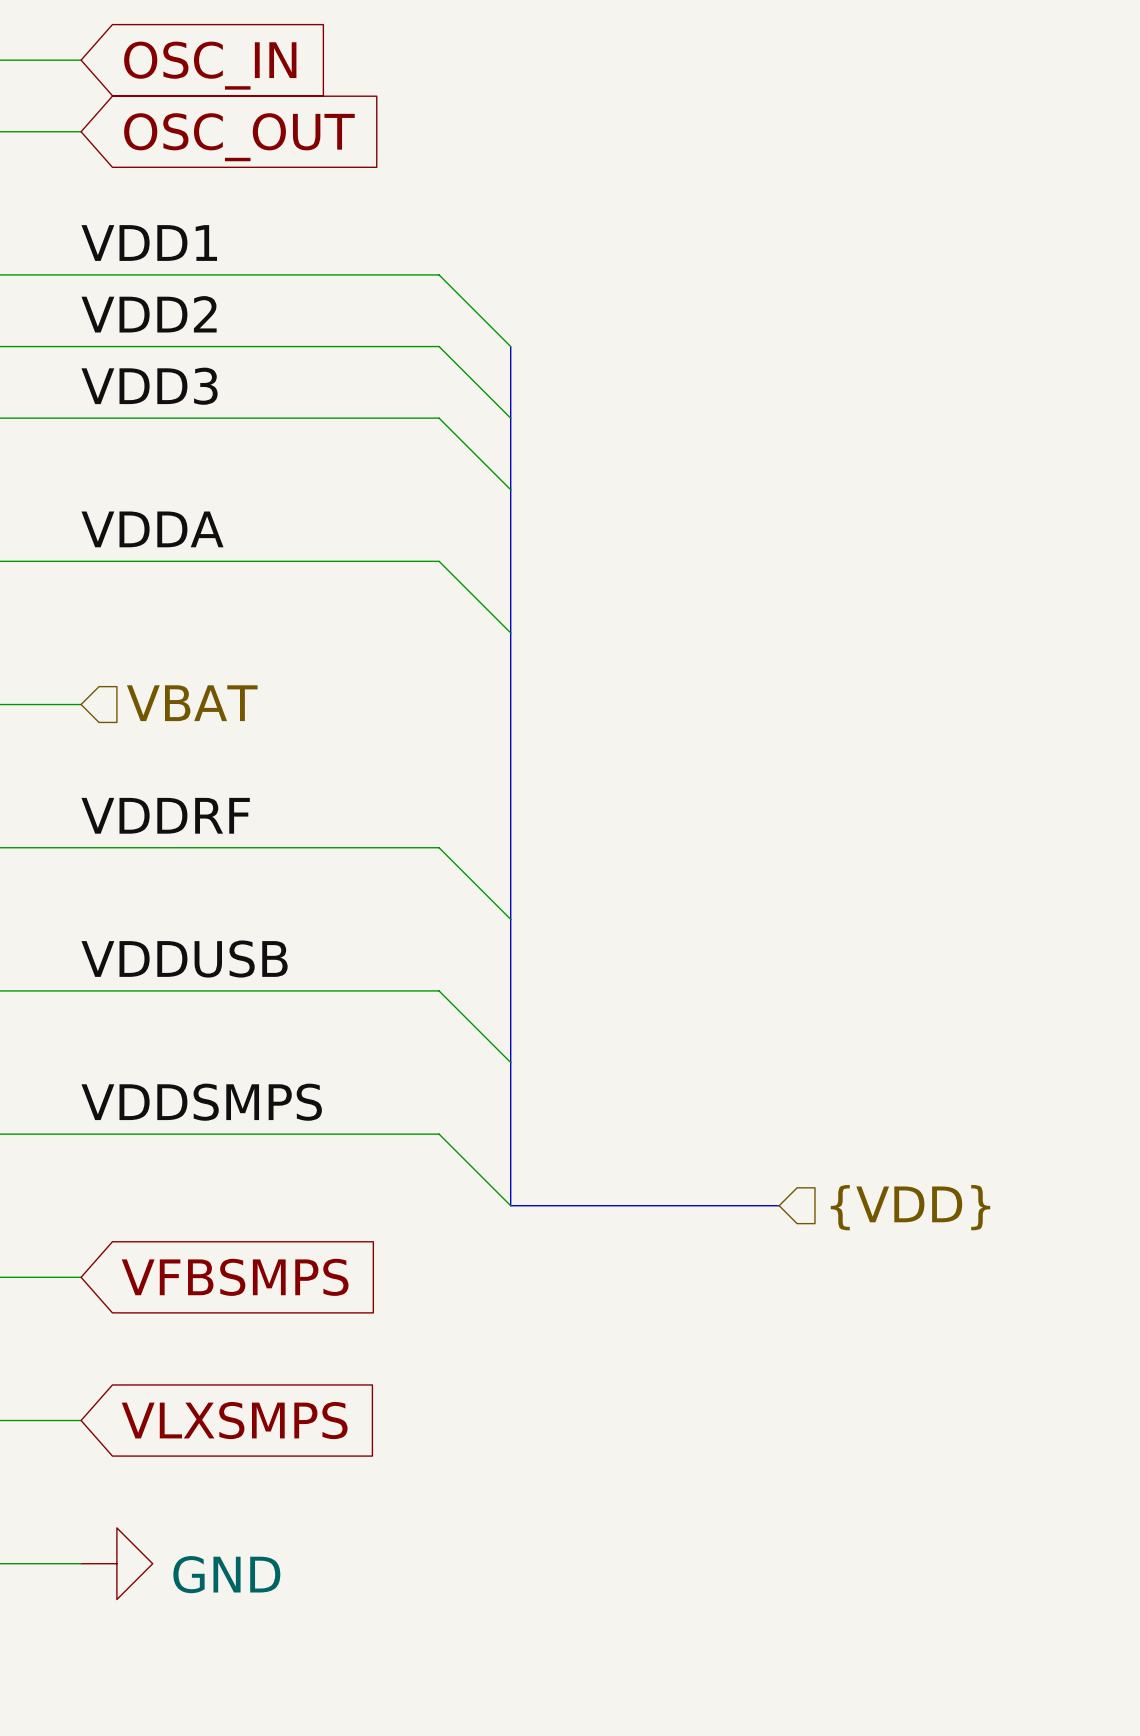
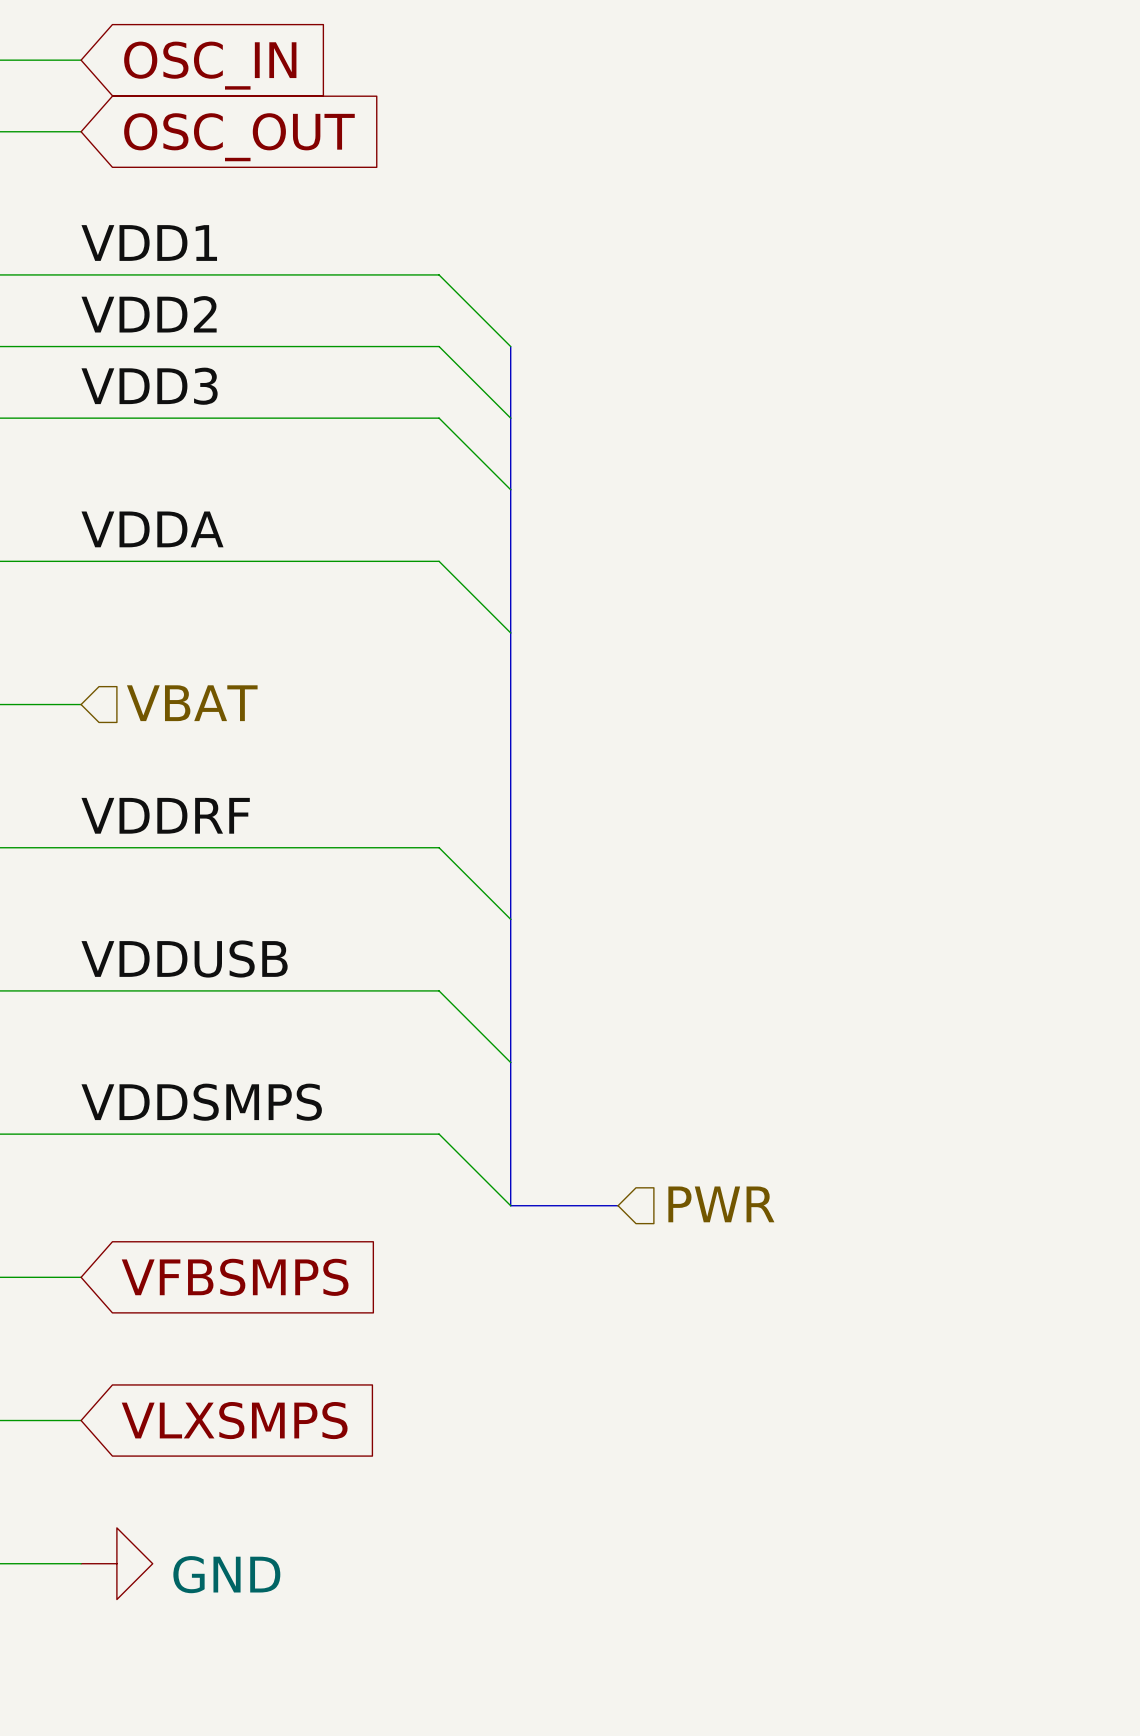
hierarchical label: none -> PWR (721, 1204)
bus: (618, 1205) (779, 1205) -> none
hierarchical label: {VDD} (910, 1207) -> none

